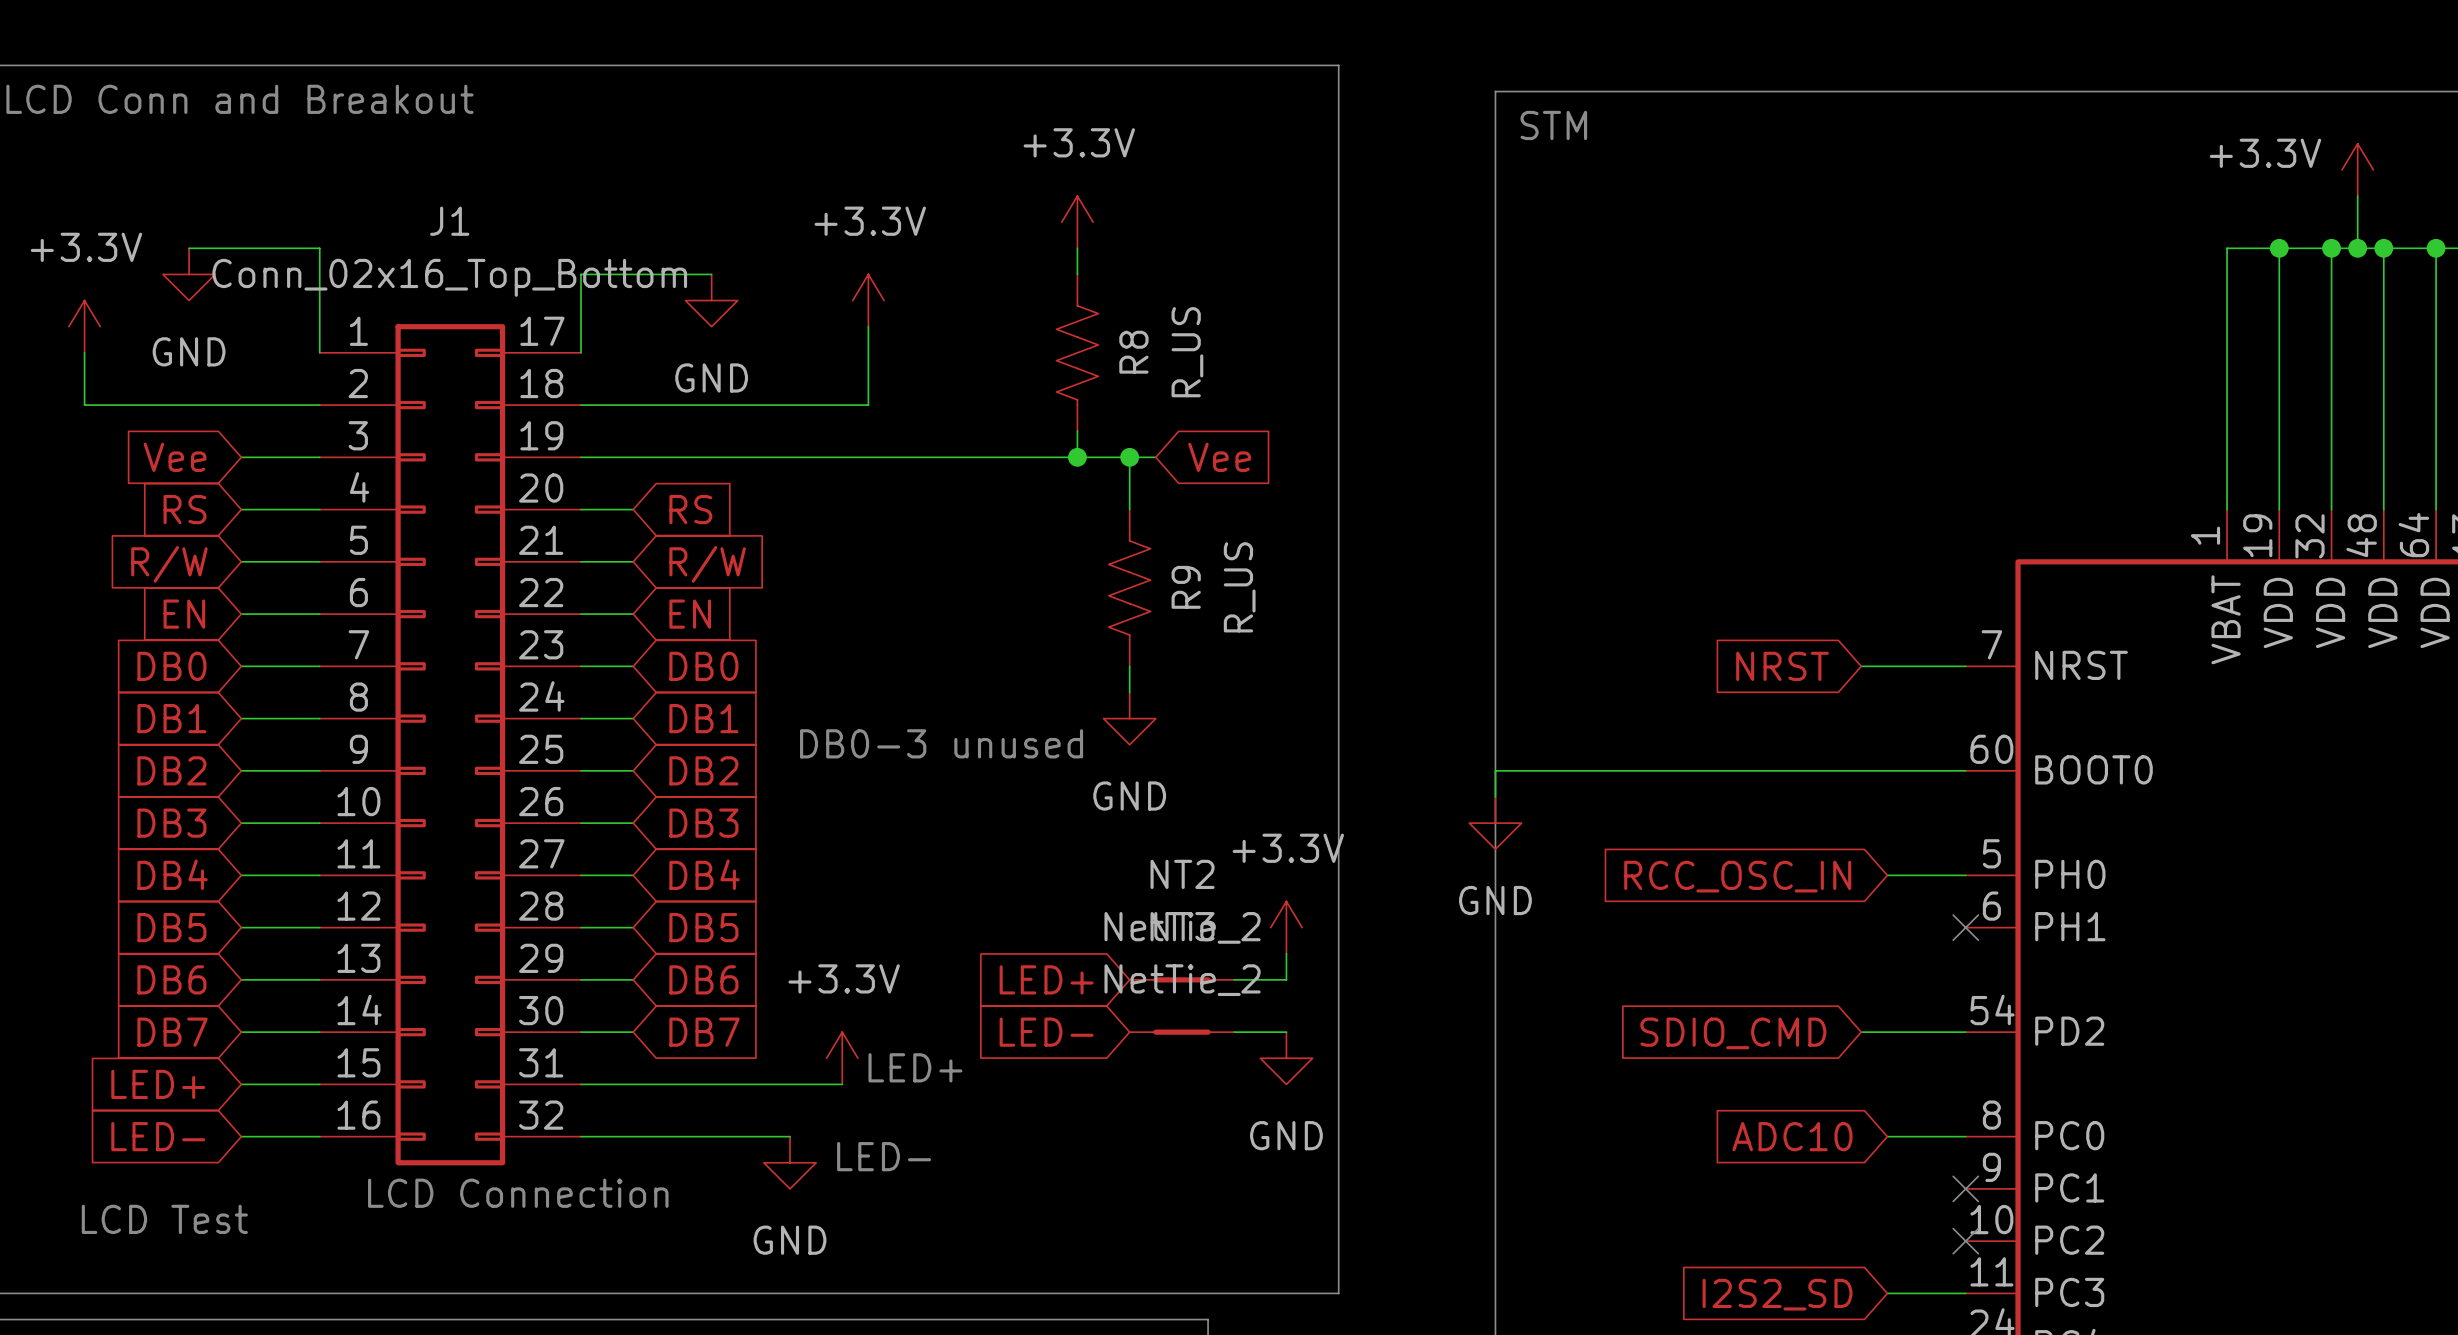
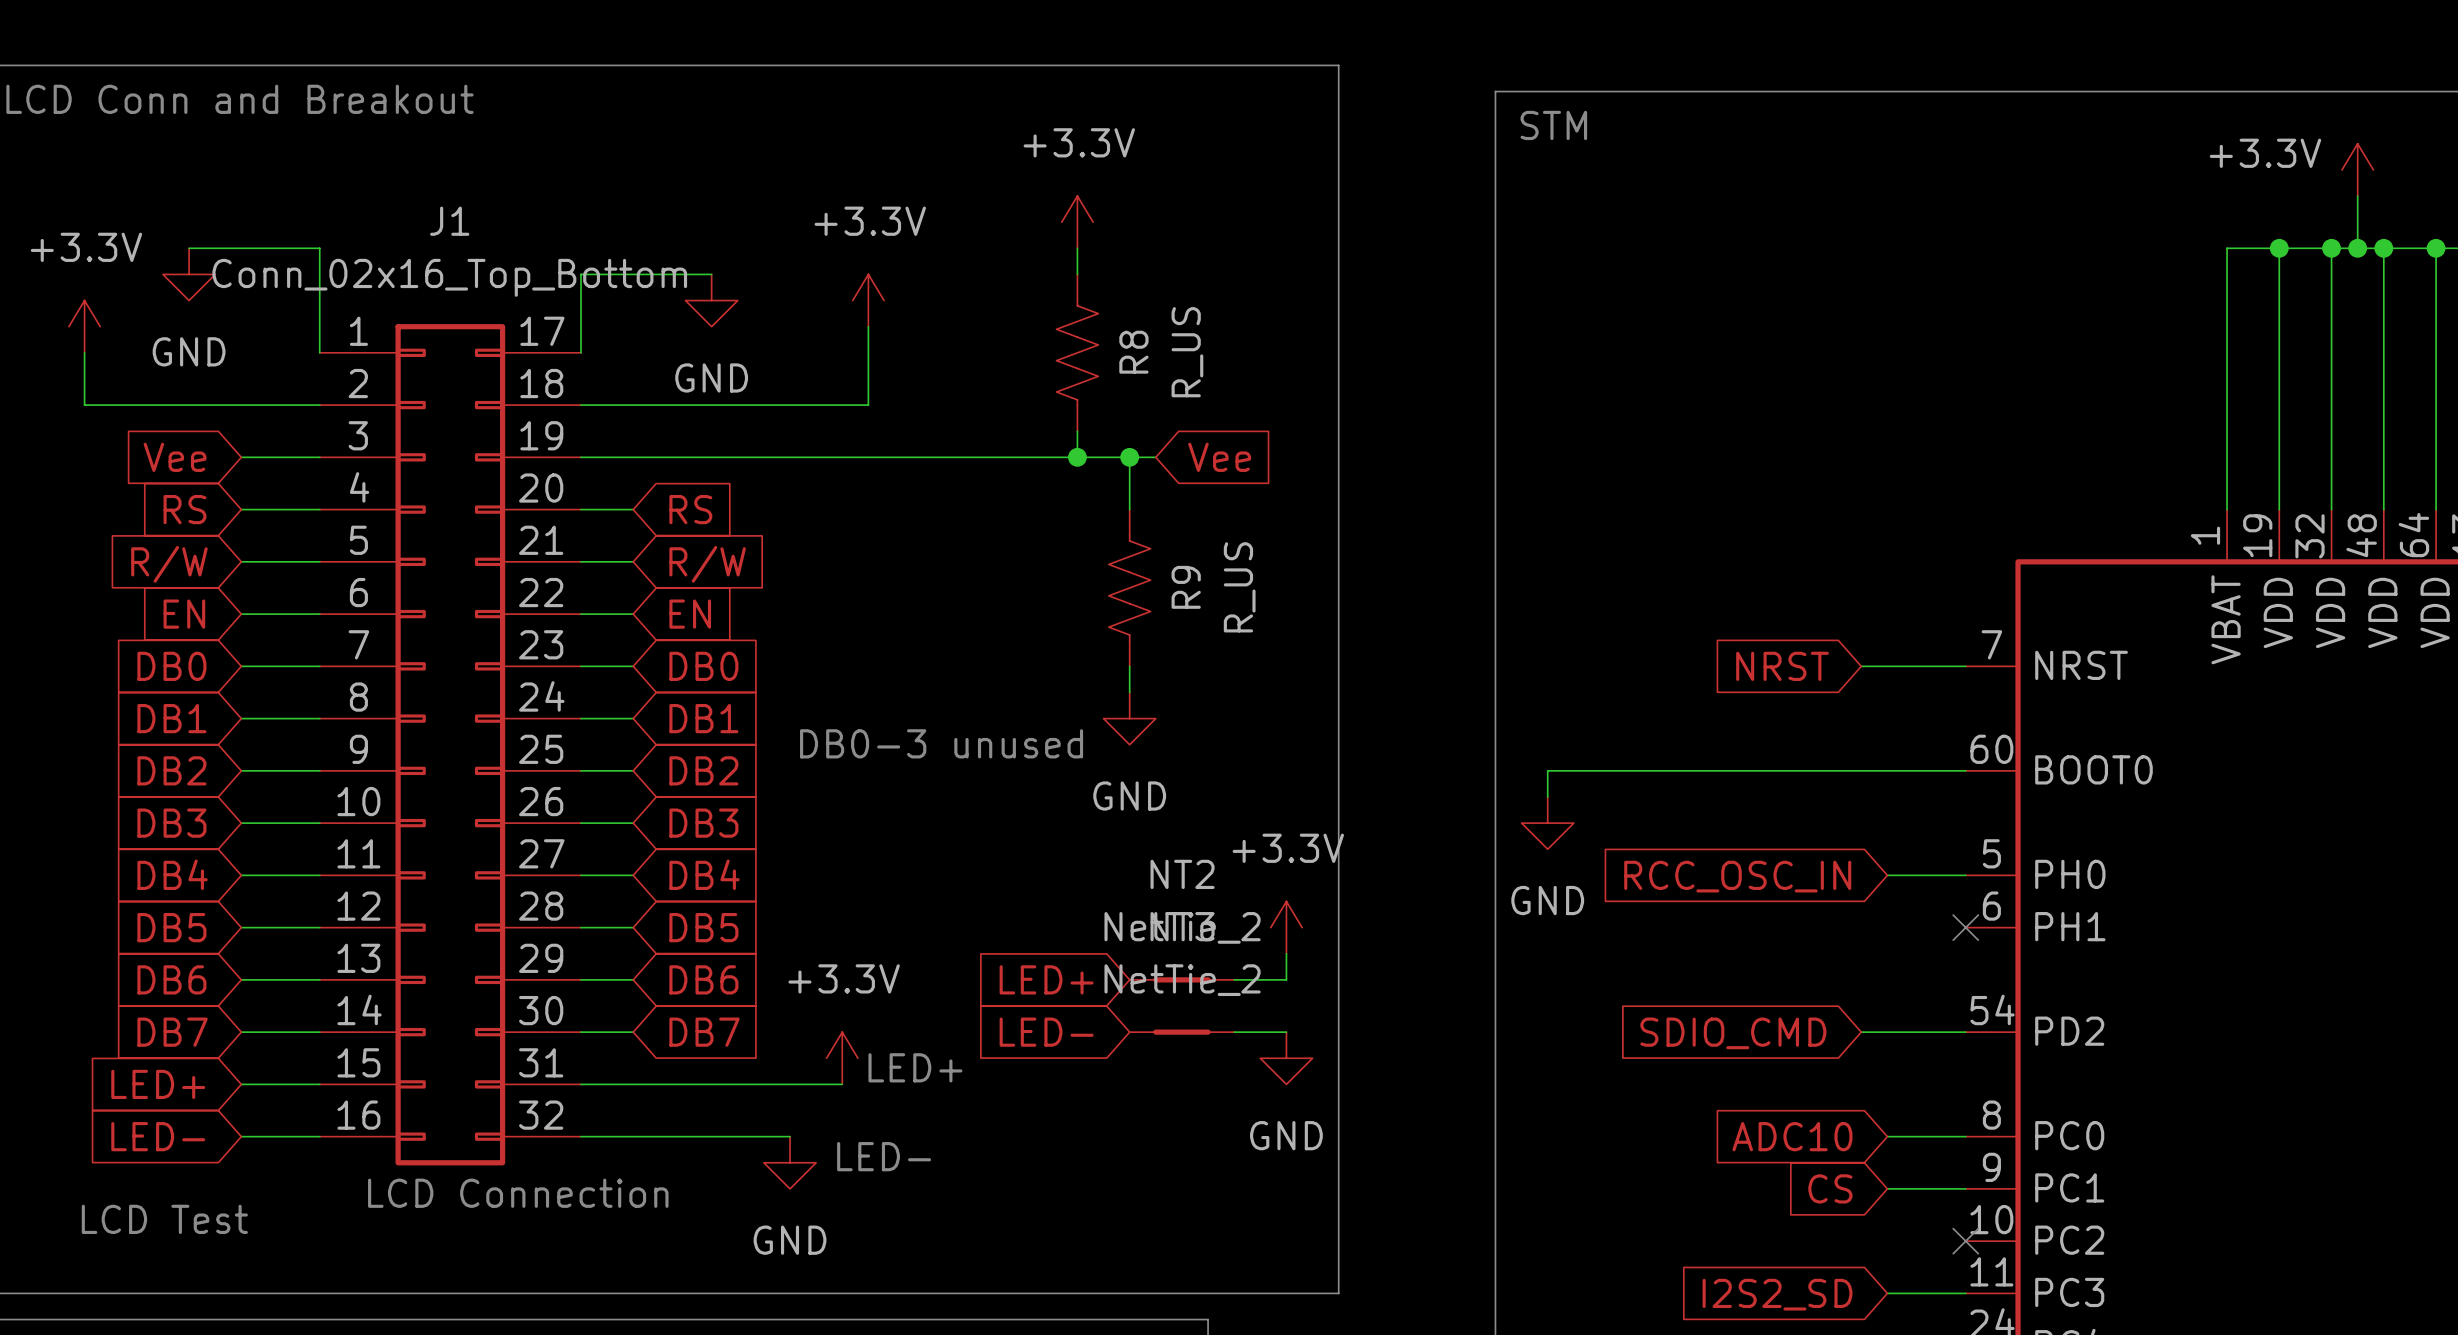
wire: (1547, 770) (1495, 770) (1495, 796) -> (1547, 770) (1547, 796)
power symbol position: GND (1495, 823) -> GND (1547, 823)
global label: none -> CS (1830, 1188)
wire: none -> (1887, 1188) (1965, 1188)
no-connect mark: (1965, 1188) -> none

